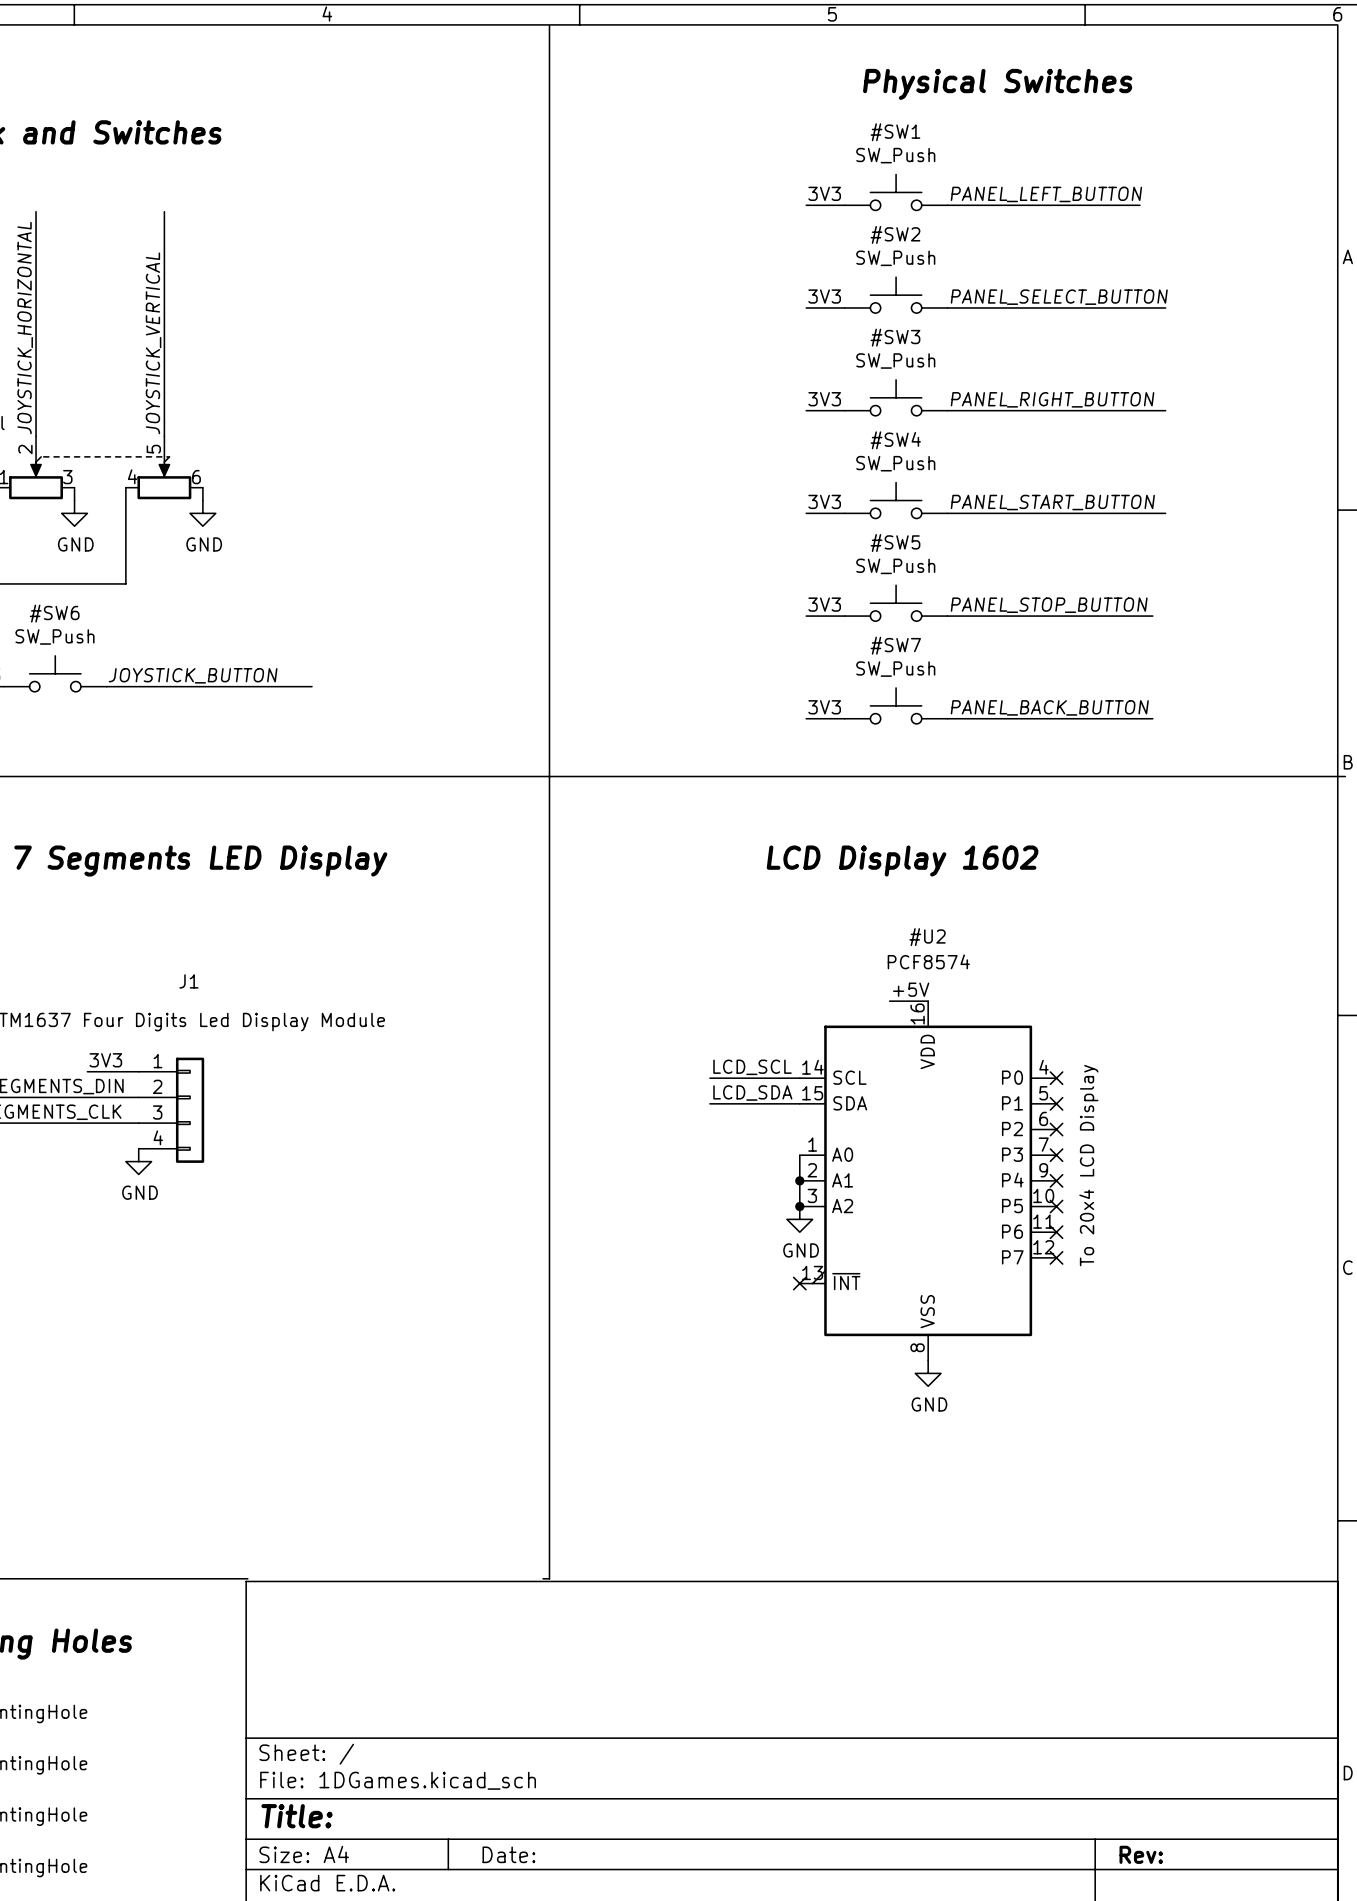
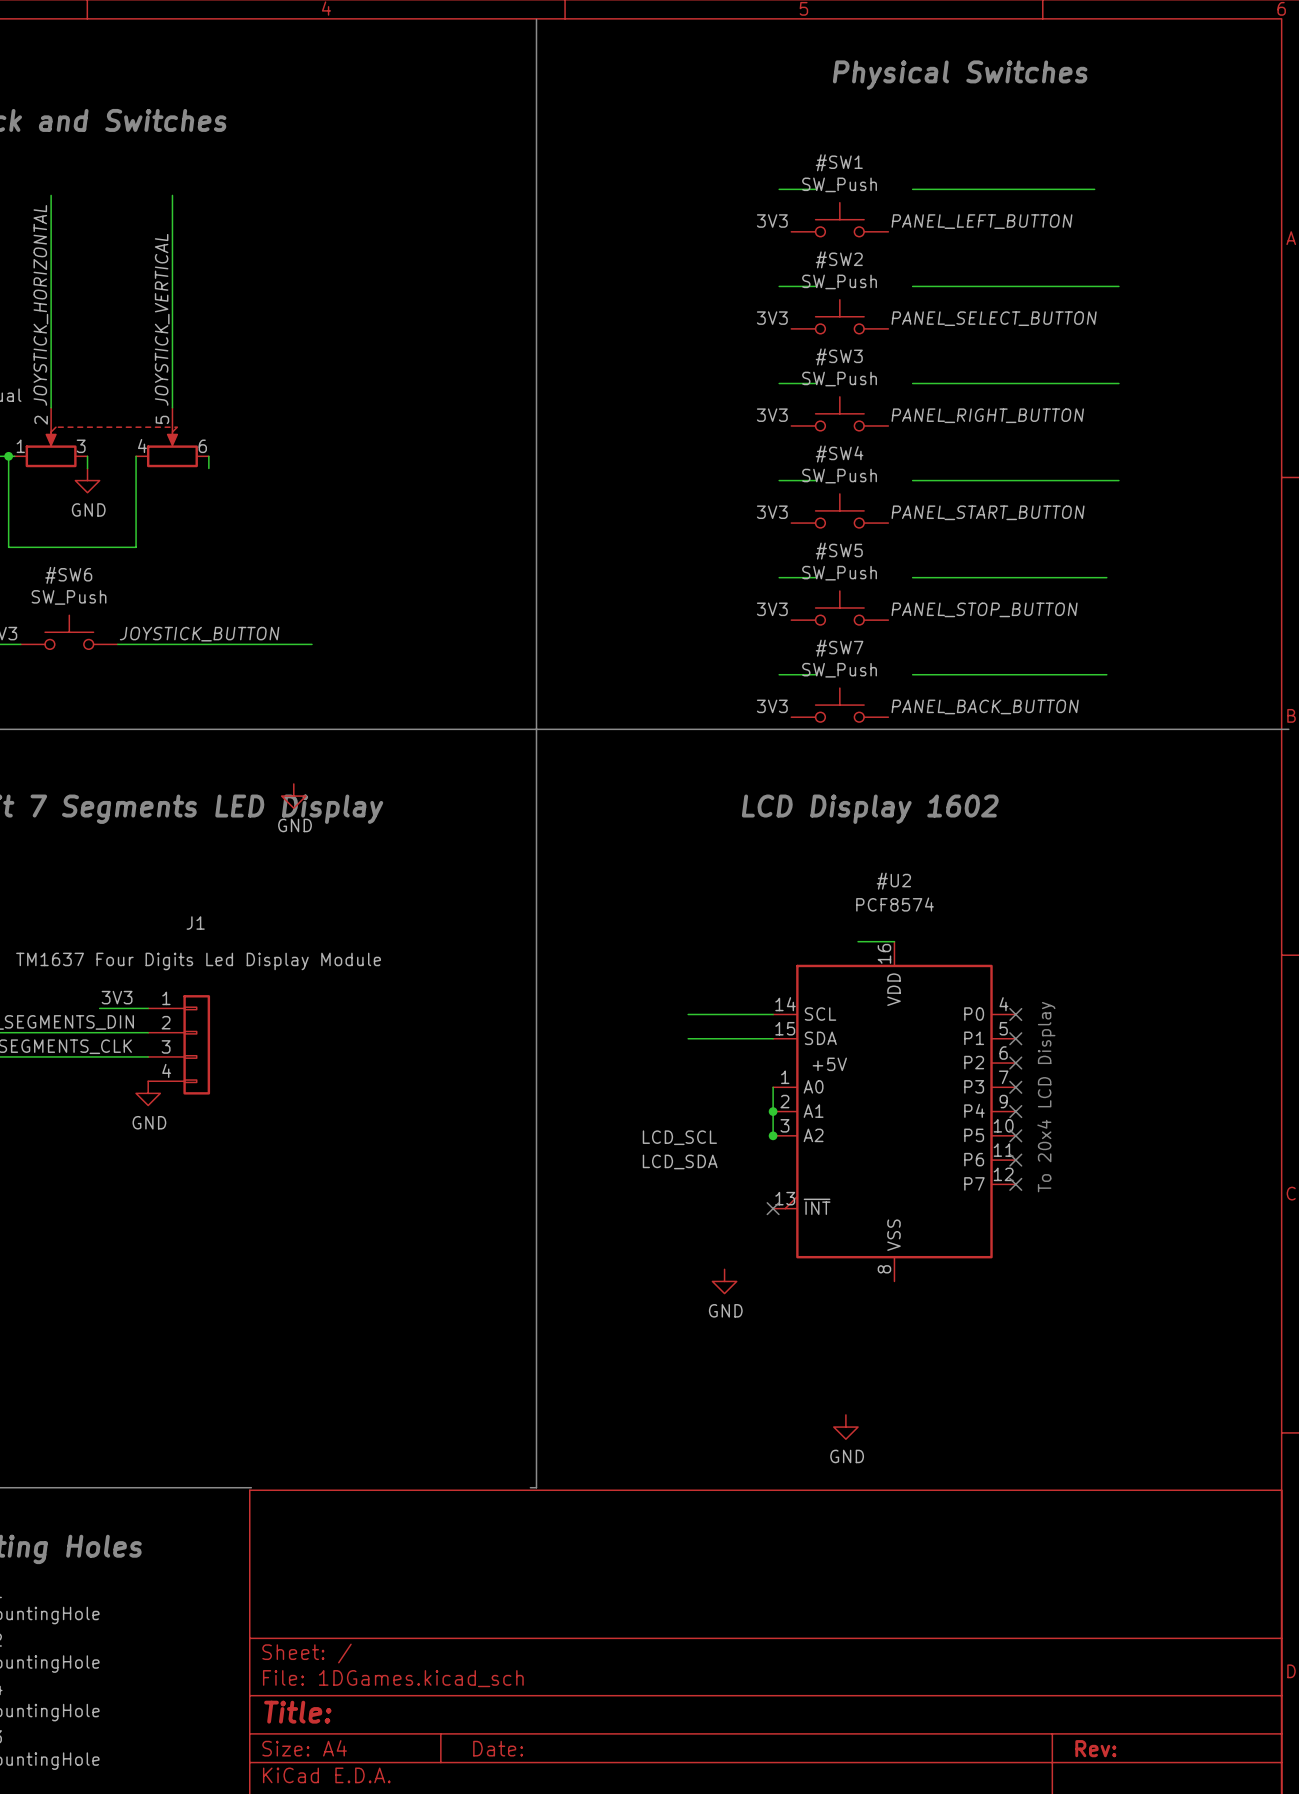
#SW1 position: SW_Push (896, 192) -> SW_Push (839, 219)
label: 3V3 (824, 193) -> none
label position: PANEL_LEFT_BUTTON (1046, 194) -> PANEL_LEFT_BUTTON (981, 221)
label: none -> 3V3 (772, 221)
#SW2 position: SW_Push (896, 295) -> SW_Push (839, 316)
label: 3V3 (824, 296) -> none
label position: PANEL_SELECT_BUTTON (1059, 297) -> PANEL_SELECT_BUTTON (994, 318)
label: none -> 3V3 (772, 318)
#SW3 position: SW_Push (896, 397) -> SW_Push (839, 413)
label: 3V3 (824, 399) -> none
label position: PANEL_RIGHT_BUTTON (1052, 399) -> PANEL_RIGHT_BUTTON (987, 415)
label: none -> 3V3 (772, 415)
#SW4 position: SW_Push (896, 500) -> SW_Push (839, 510)
label: 3V3 (824, 501) -> none
label position: PANEL_START_BUTTON (1052, 502) -> PANEL_START_BUTTON (988, 512)
power symbol: GND (202, 513) -> none
label: none -> 3V3 (772, 512)
#SW5 position: SW_Push (896, 603) -> SW_Push (839, 607)
label: 3V3 (824, 604) -> none
label position: PANEL_STOP_BUTTON (1049, 605) -> PANEL_STOP_BUTTON (984, 609)
label: none -> 3V3 (772, 609)
#SW7 position: SW_Push (896, 705) -> SW_Push (839, 705)
label: 3V3 (824, 707) -> none
label position: PANEL_BACK_BUTTON (1049, 707) -> PANEL_BACK_BUTTON (985, 706)
label: none -> 3V3 (772, 706)
power symbol: none -> GND (293, 796)
label position: +5V (911, 989) -> +5V (829, 1064)
label position: LCD_SCL (752, 1067) -> LCD_SCL (679, 1137)
label position: LCD_SDA (752, 1093) -> LCD_SDA (680, 1161)
power symbol: GND (799, 1219) -> none
power symbol: none -> GND (724, 1281)
power symbol: GND (928, 1373) -> none
power symbol: none -> GND (845, 1427)

